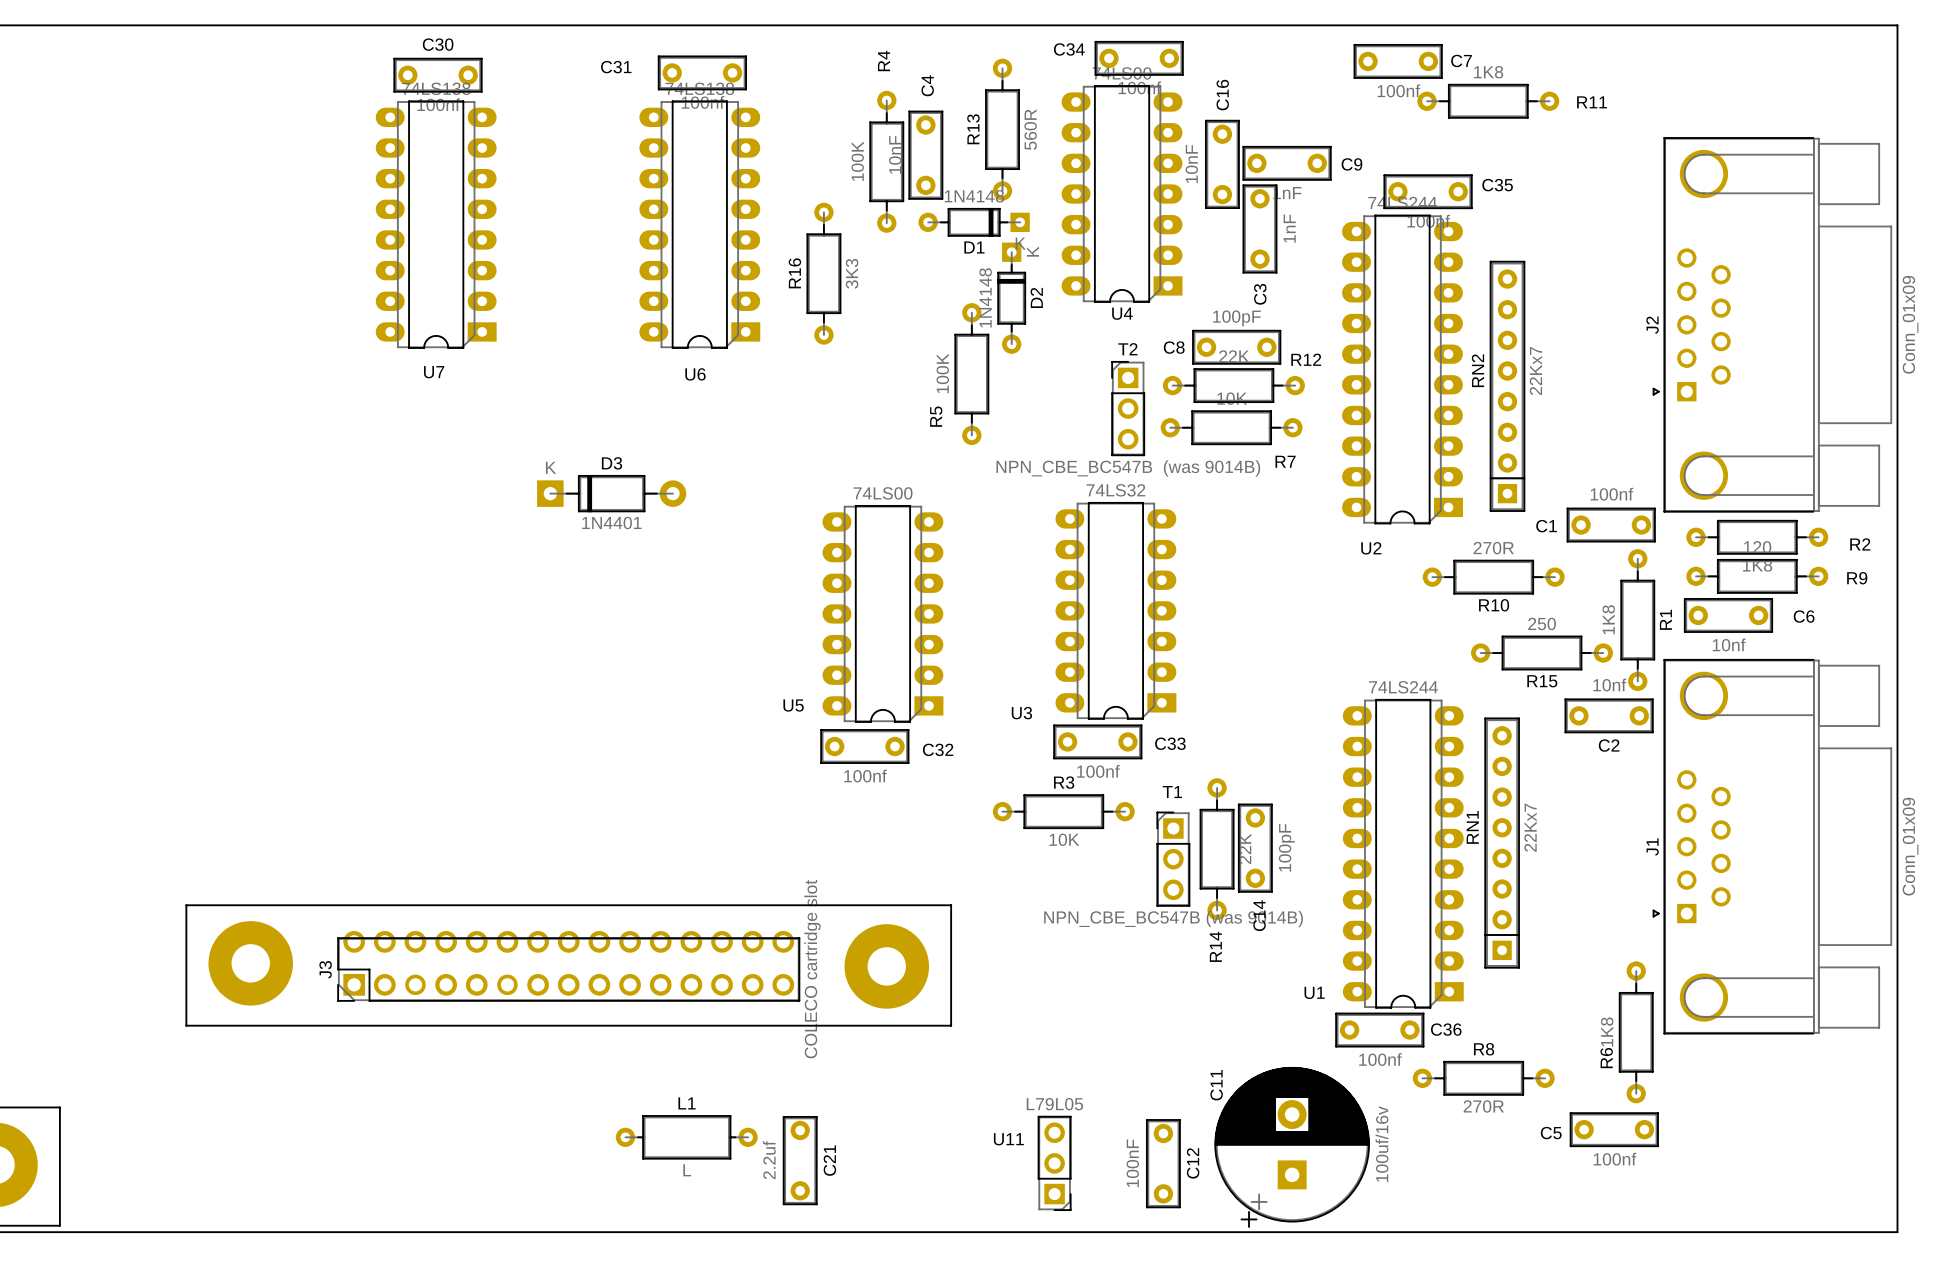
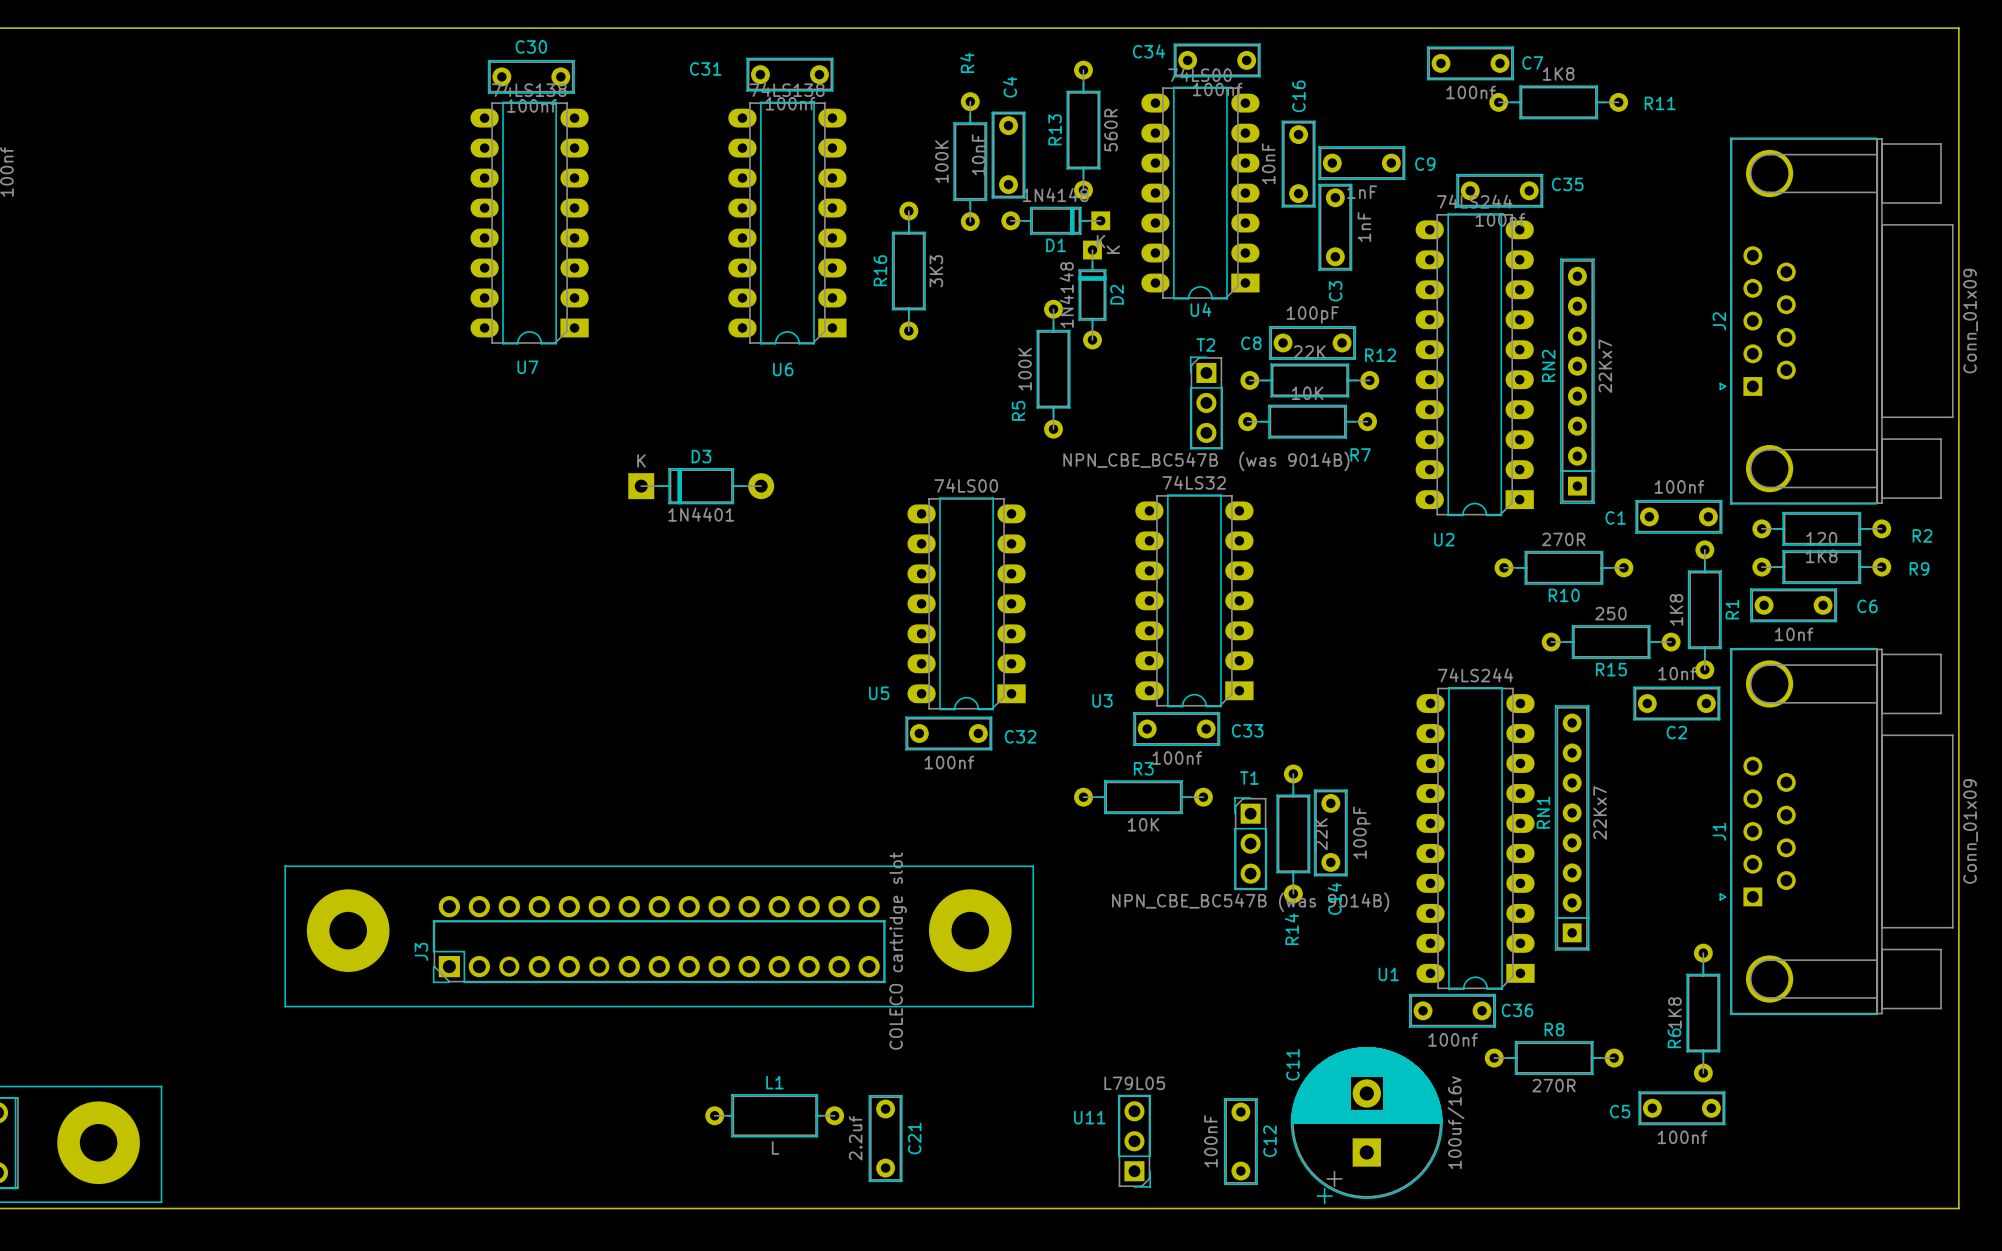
J3 footprint: [185, 904, 952, 1027] -> [284, 865, 1034, 1008]

